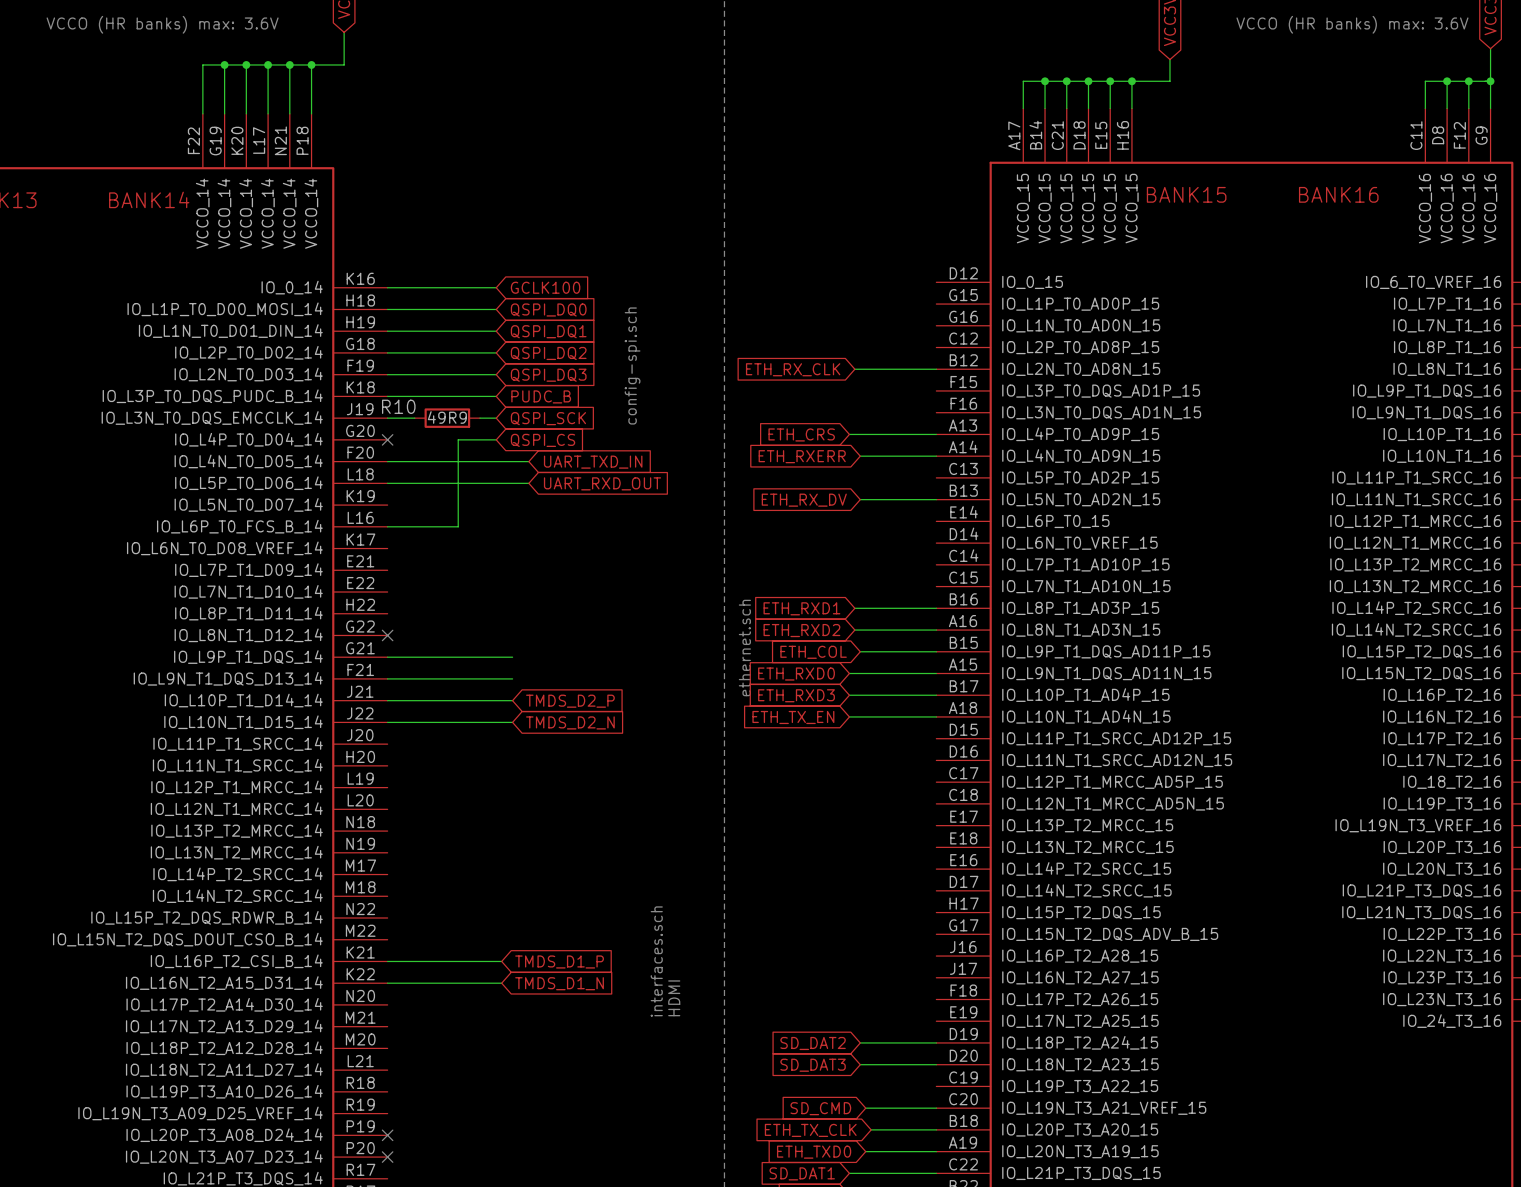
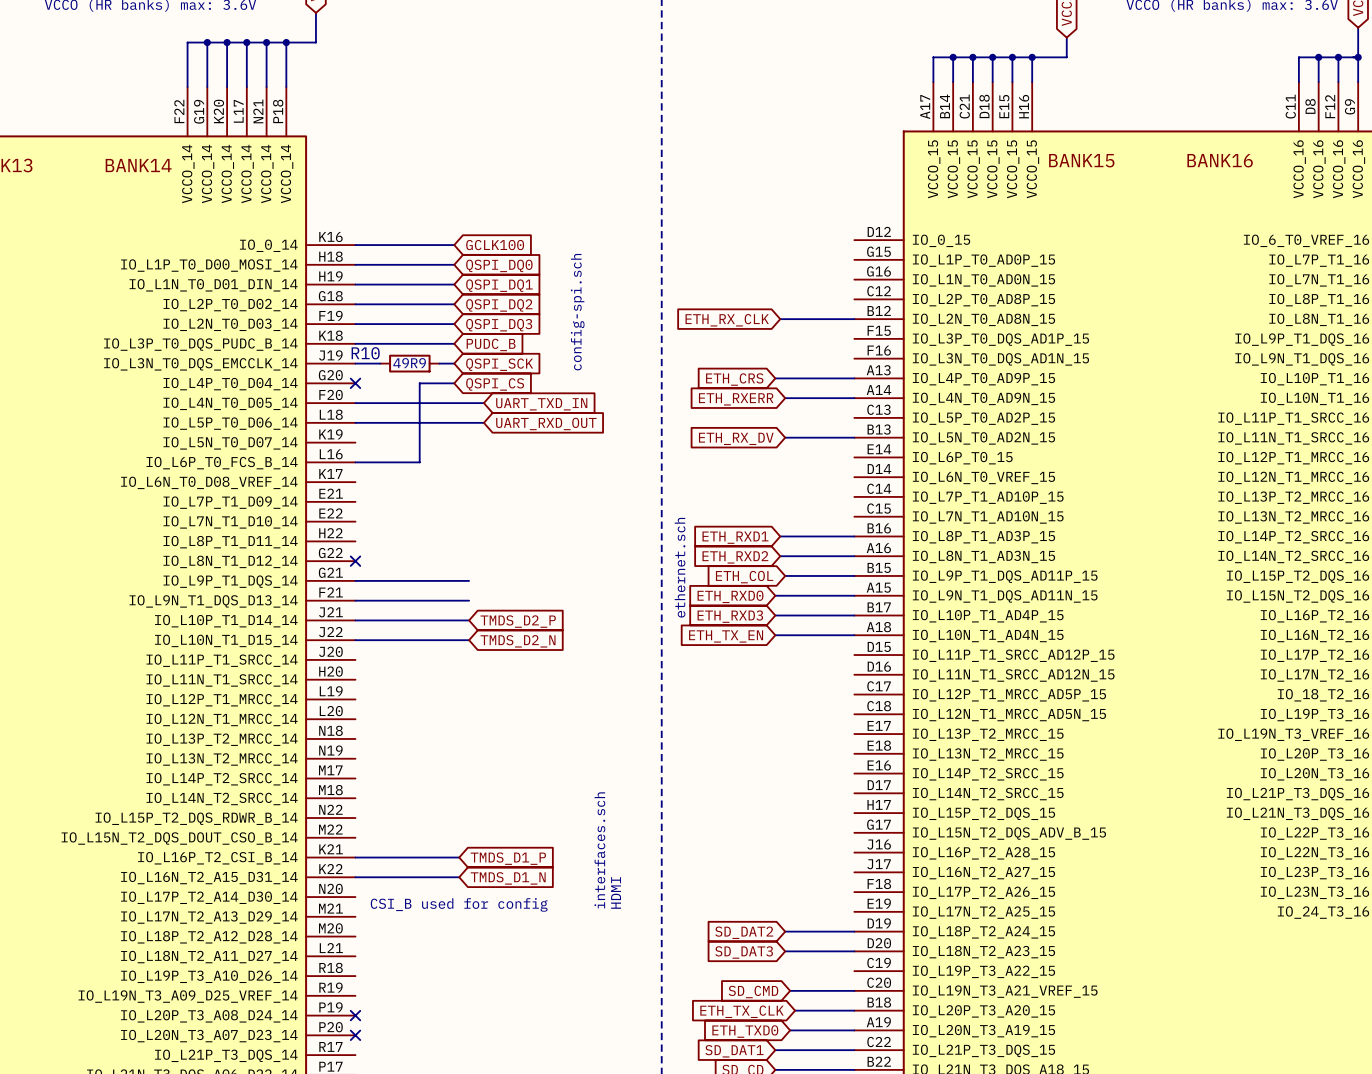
text: none -> CSI_B used for config (459, 904)

